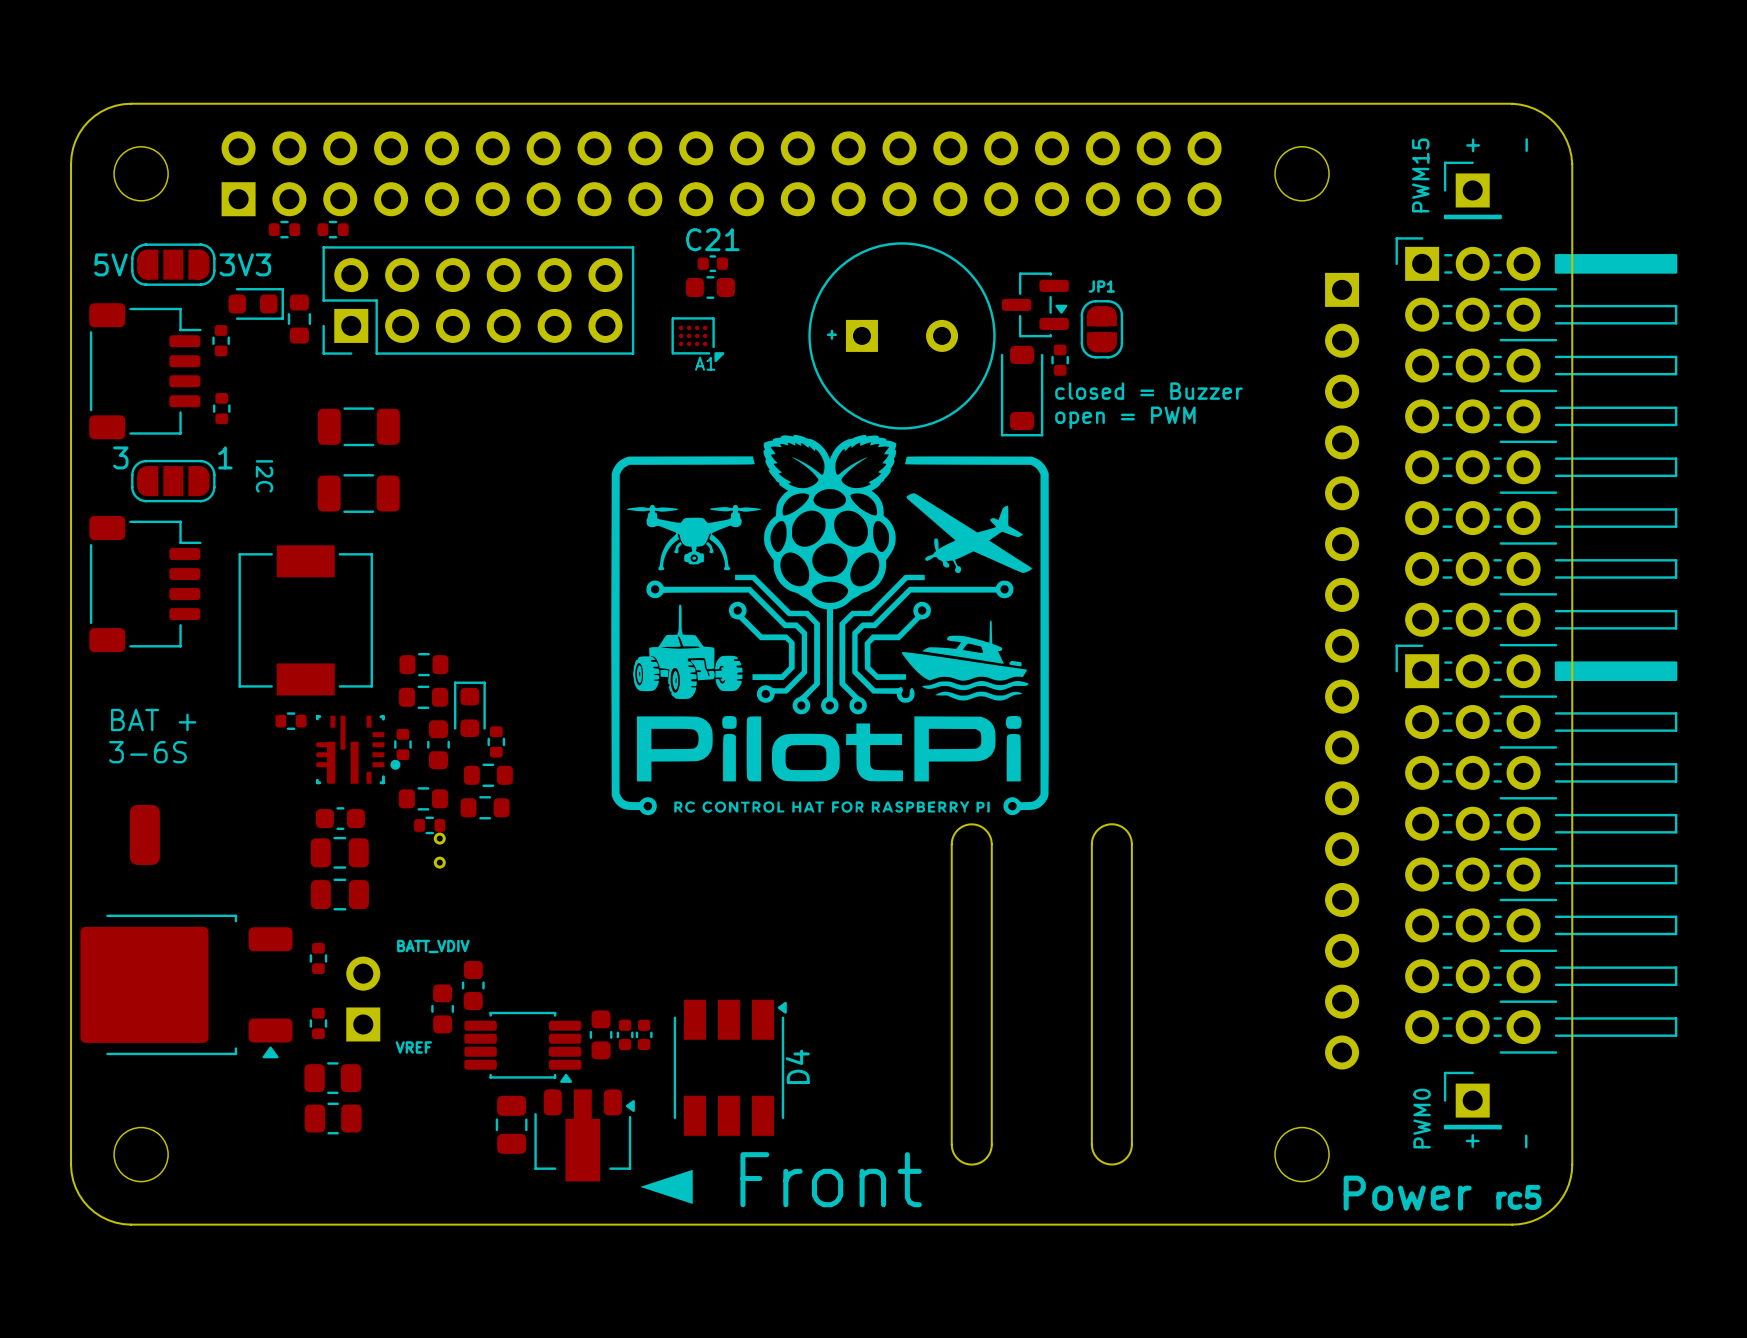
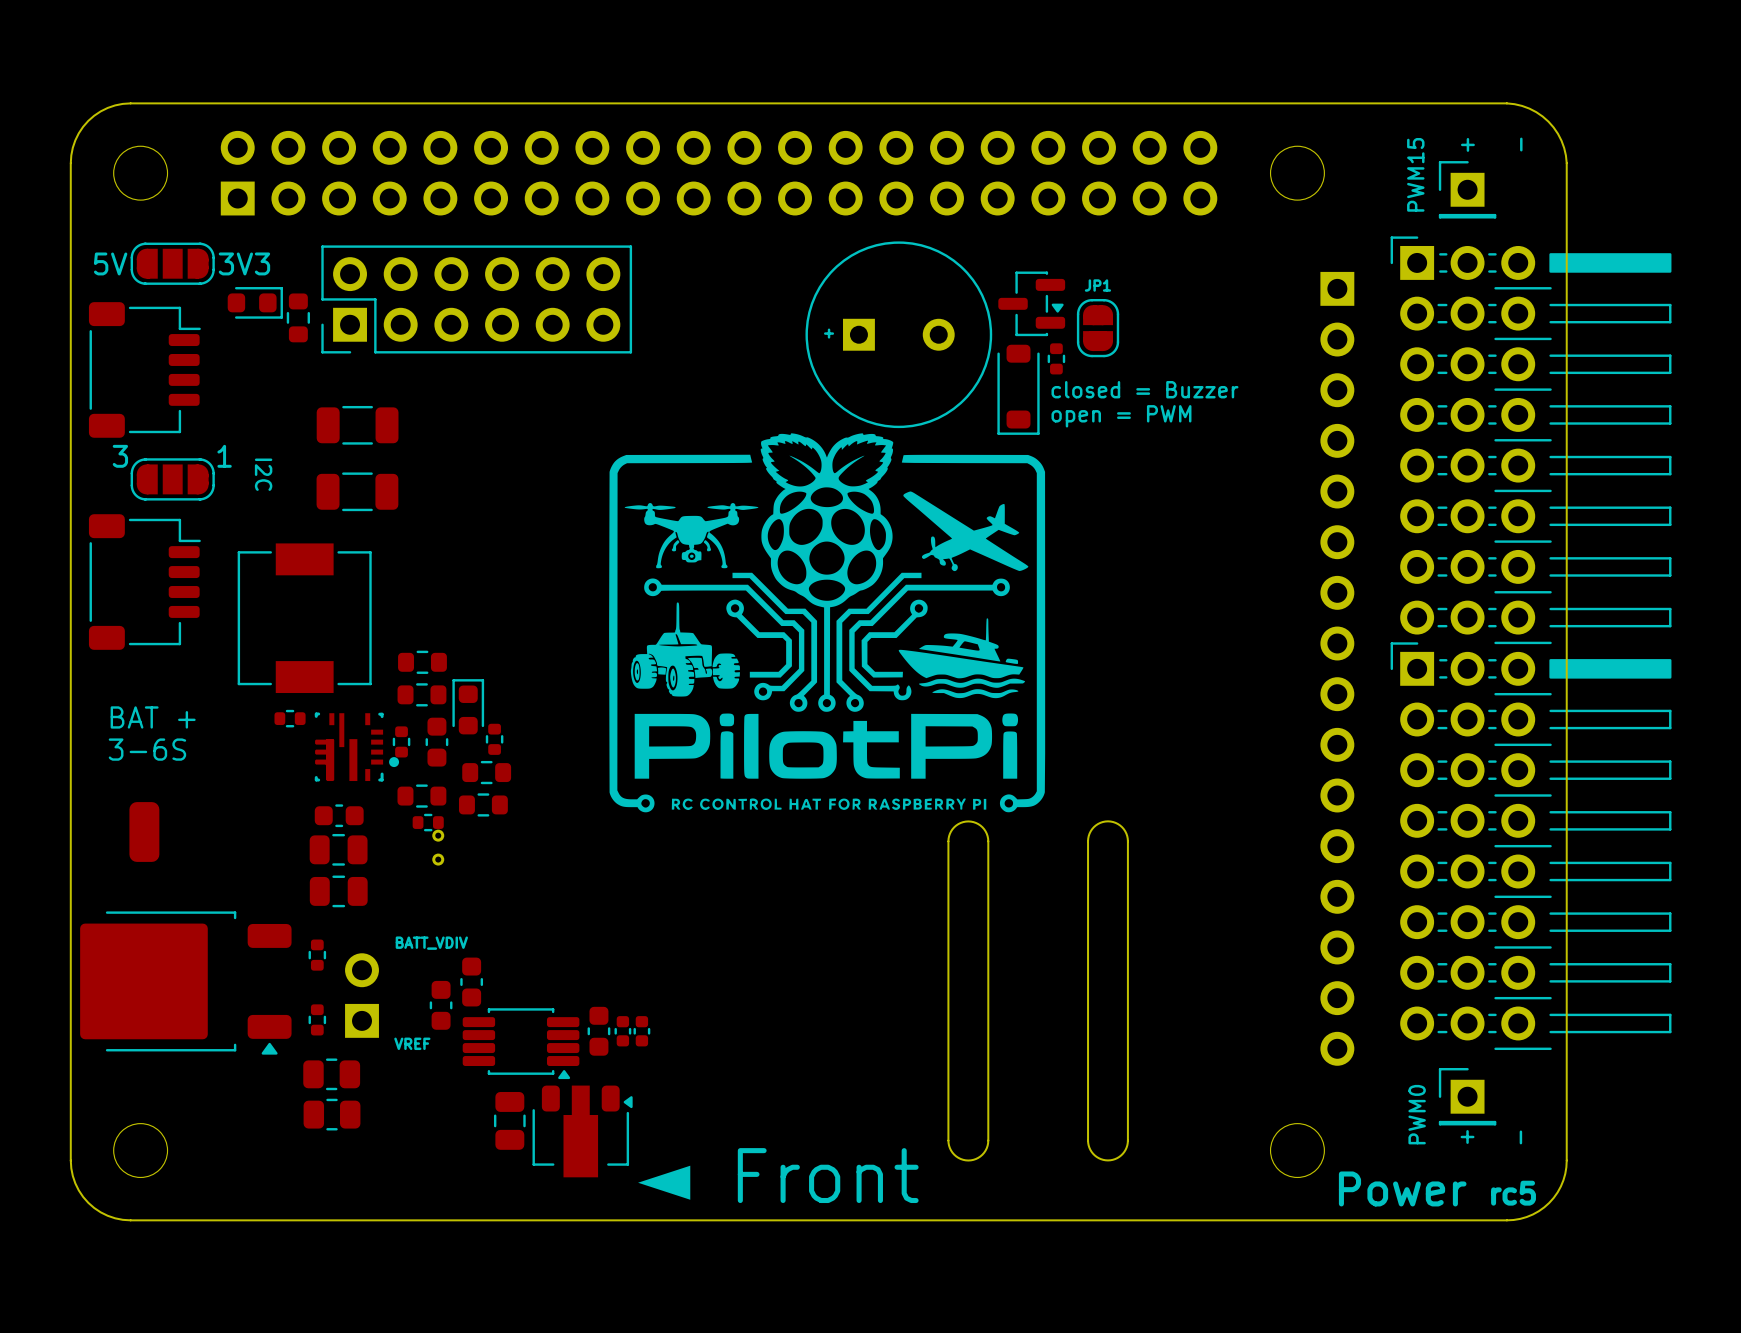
part: (284, 229) -> none
part: (333, 229) -> none
C21: (712, 263) -> none
part: (710, 287) -> none
part: (697, 339) -> none
part: (221, 340) -> none
part: (221, 408) -> none
D4: (730, 1067) -> none

